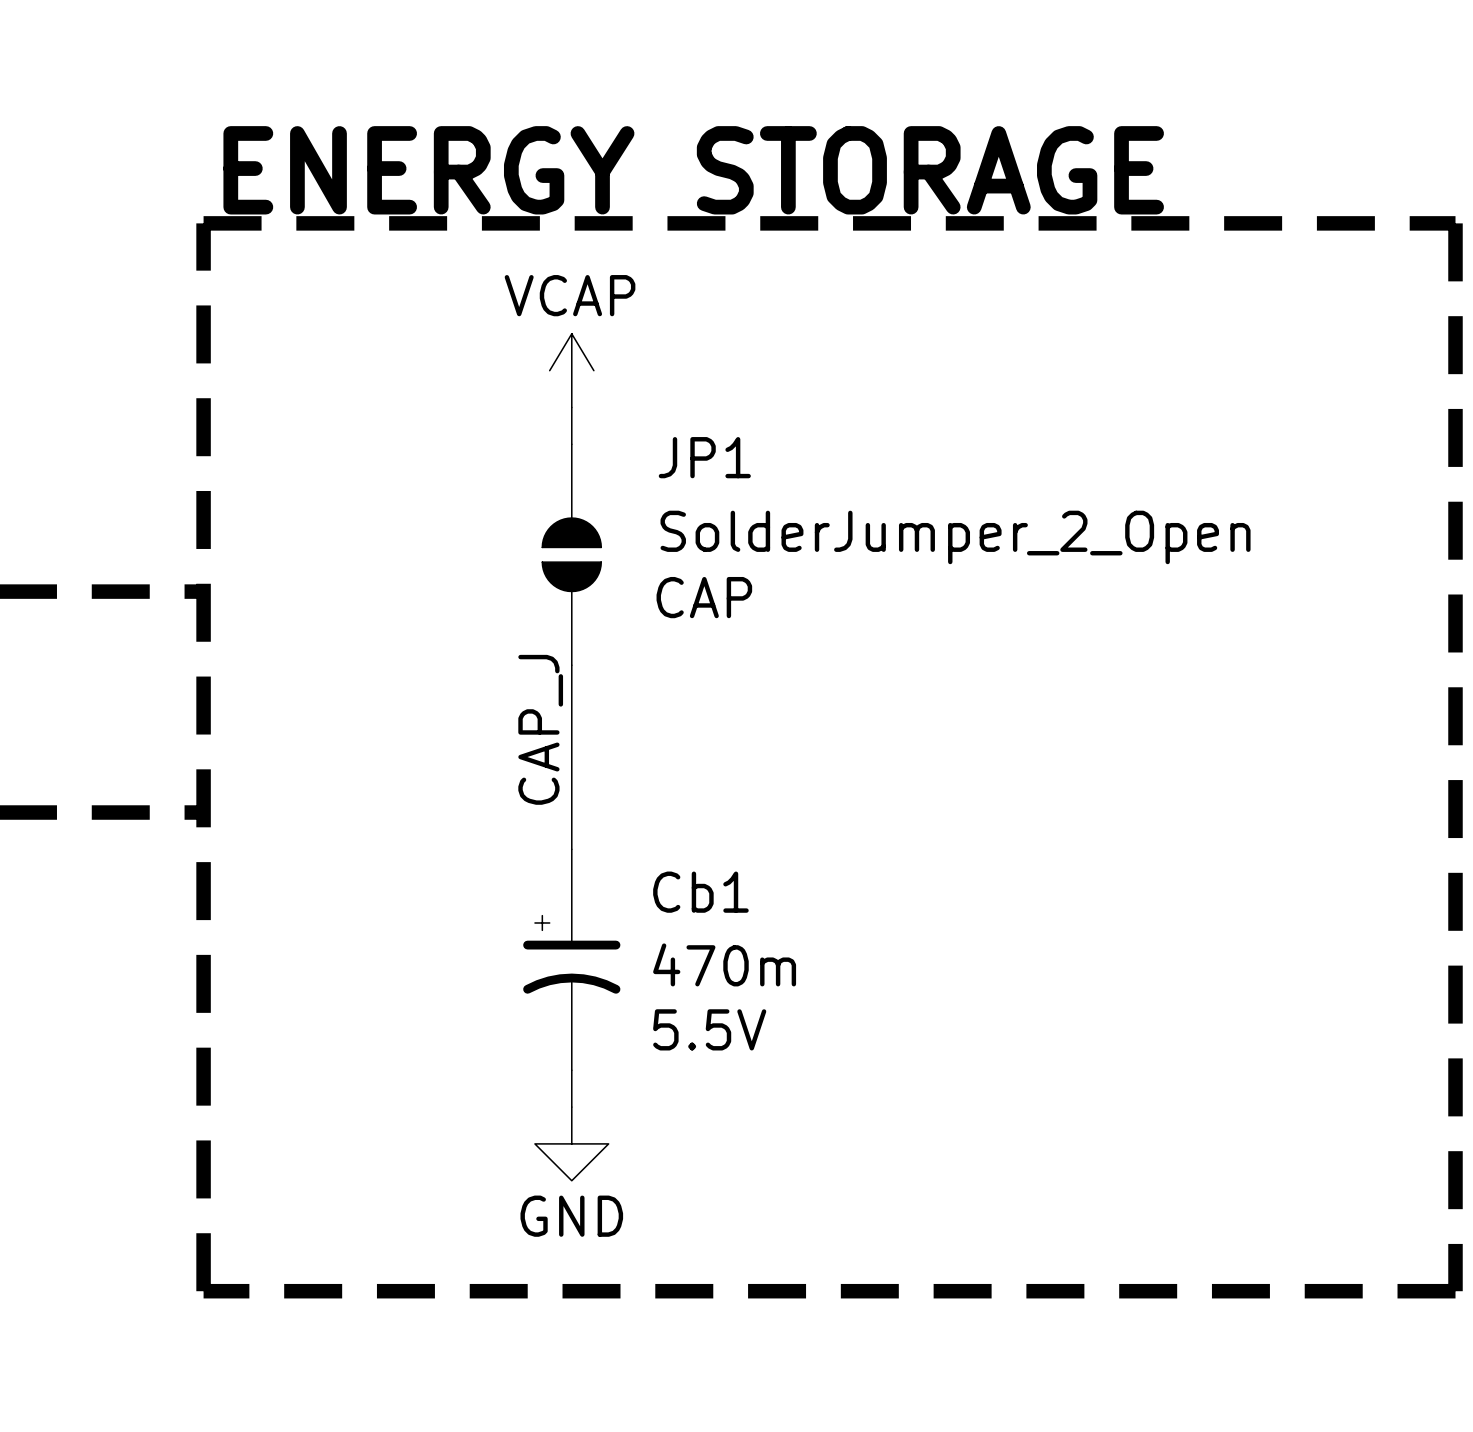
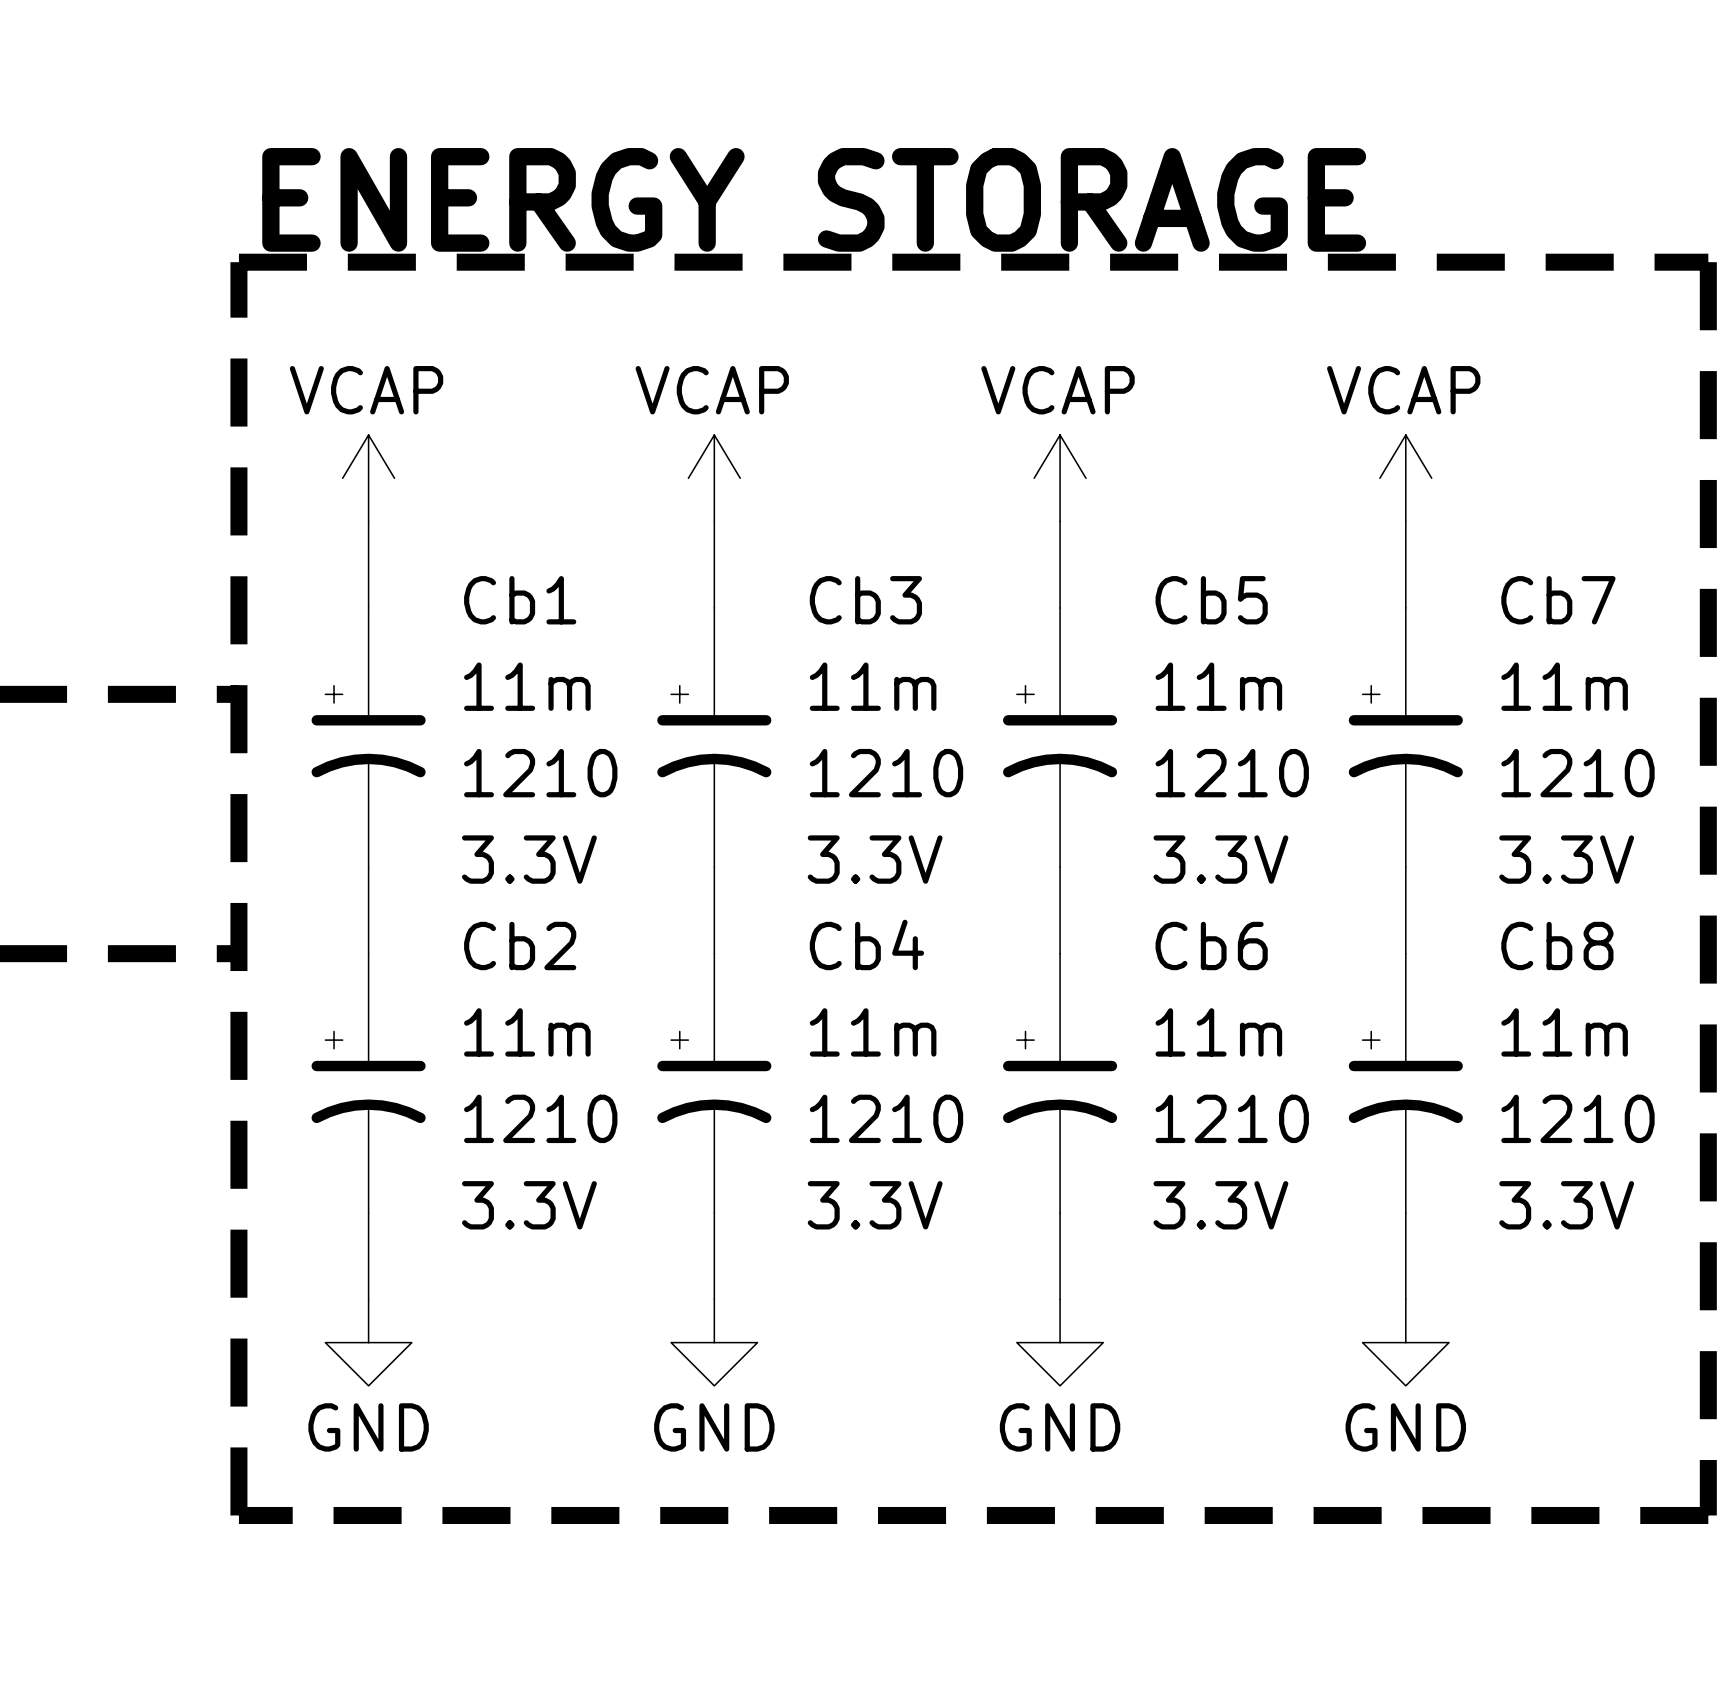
power symbol position: VCAP (571, 370) -> VCAP (714, 478)
power symbol: none -> VCAP (368, 478)
wire: (571, 407) (571, 444) -> none
power symbol: none -> VCAP (1060, 478)
power symbol: none -> VCAP (1405, 478)
wire: none -> (368, 521) (368, 607)
wire: none -> (714, 521) (714, 607)
wire: none -> (1060, 521) (1060, 607)
wire: none -> (1405, 521) (1405, 607)
JP1: SolderJumper_2_Open (571, 554) -> none
Cb3: none -> 11m (714, 737)
Cb5: none -> 11m (1060, 737)
Cb7: none -> 11m (1405, 737)
Cb1 text: none -> 1210 (540, 773)
wire: (571, 665) (571, 849) -> none
label: CAP_J (540, 729) -> none
wire: none -> (368, 867) (368, 953)
wire: none -> (714, 867) (714, 953)
wire: none -> (1060, 867) (1060, 953)
wire: none -> (1405, 867) (1405, 953)
Cb1 name position: Cb1 (700, 892) -> Cb1 (520, 600)
Cb2: none -> 11m (368, 1083)
Cb4: none -> 11m (714, 1083)
Cb6: none -> 11m (1060, 1083)
Cb8: none -> 11m (1405, 1083)
Cb1 position: (571, 959) -> (368, 737)
Cb1 value: 470m (724, 964) -> 11m (527, 686)
Cb1 text: 5.5V (709, 1029) -> 3.3V (529, 859)
wire: none -> (368, 1212) (368, 1299)
wire: none -> (714, 1212) (714, 1299)
wire: none -> (1060, 1212) (1060, 1299)
wire: none -> (1405, 1212) (1405, 1299)
wire: (571, 1070) (571, 1107) -> none
power symbol: none -> GND (368, 1342)
power symbol position: GND (571, 1143) -> GND (714, 1342)
power symbol: none -> GND (1060, 1342)
power symbol: none -> GND (1405, 1342)

